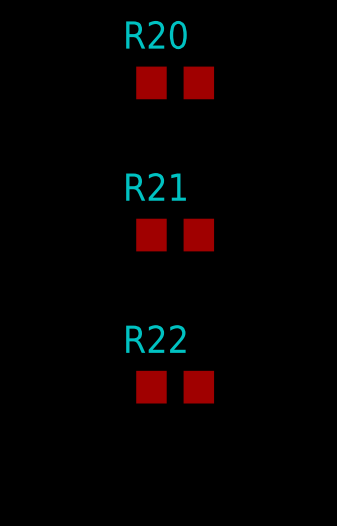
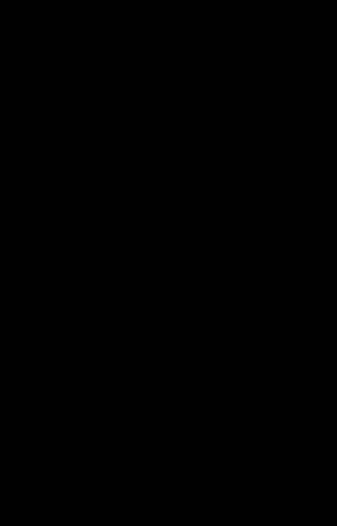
R20: (175, 82) -> none
R21: (175, 235) -> none
R22: (175, 387) -> none

